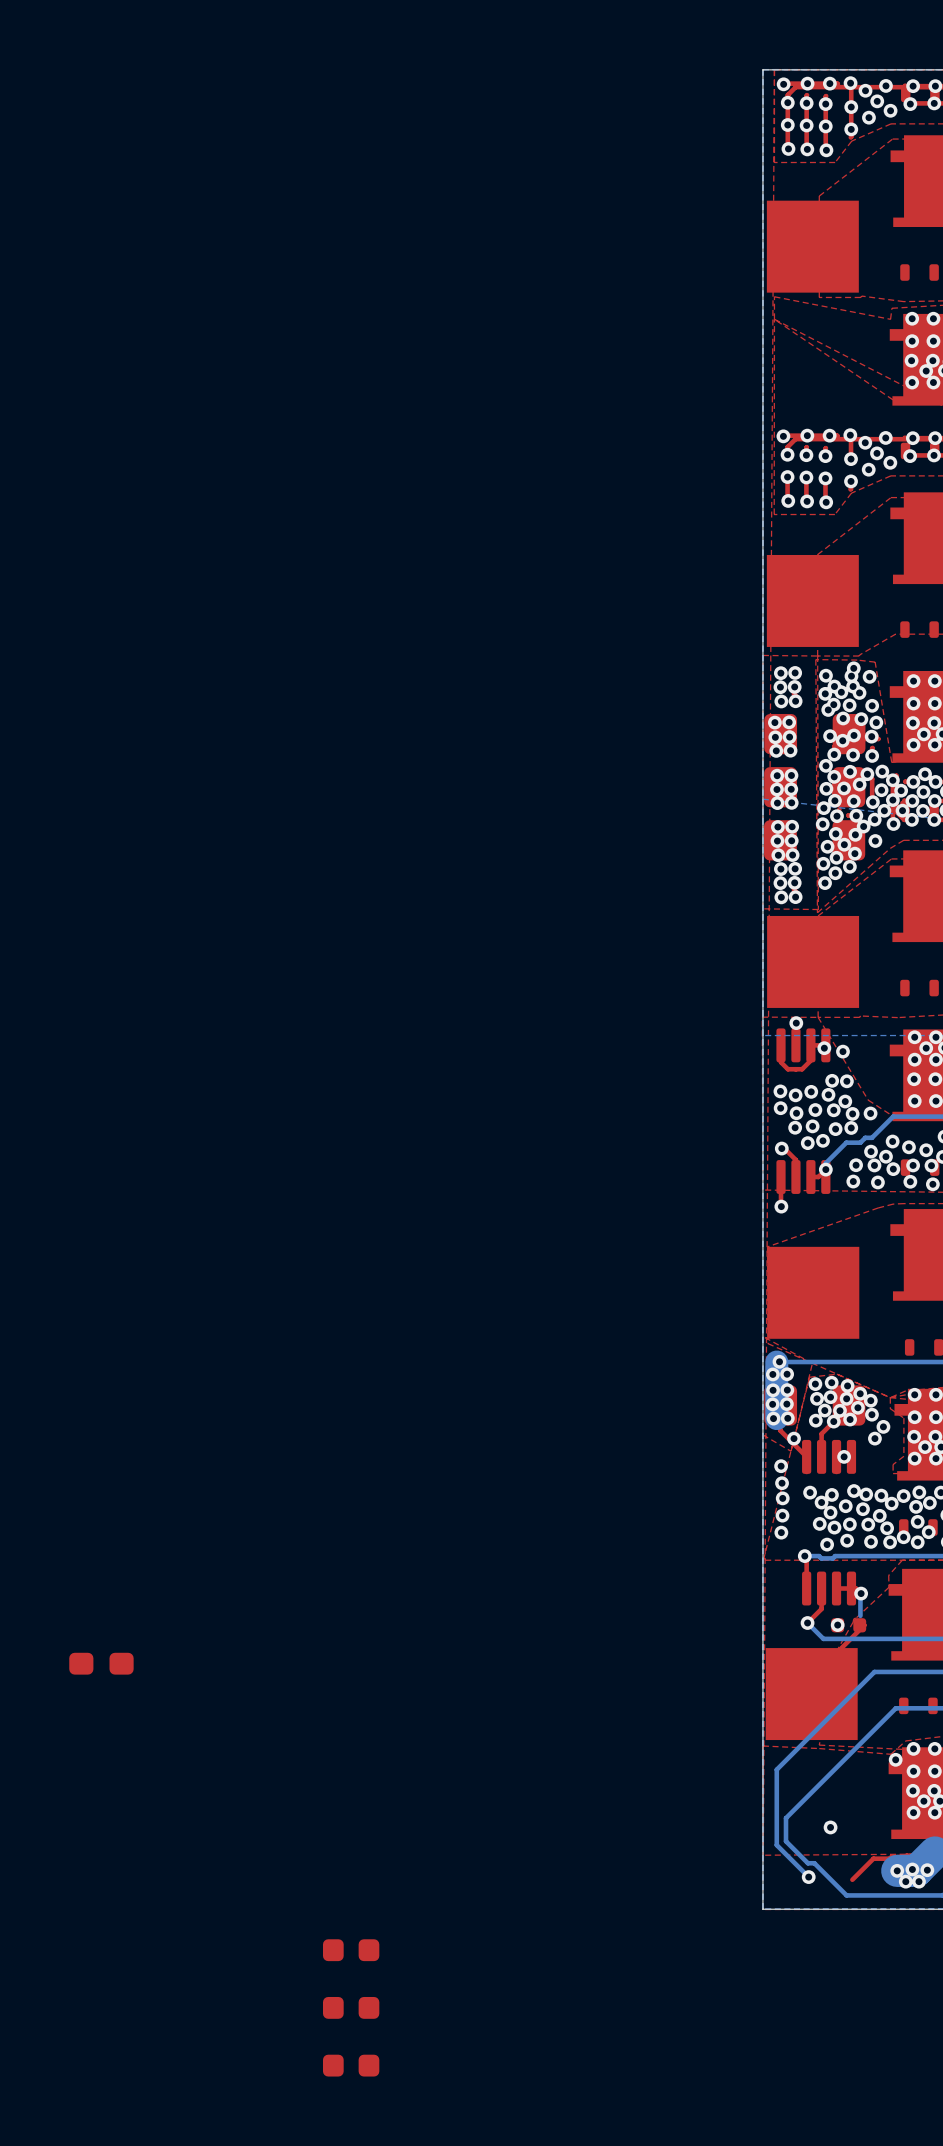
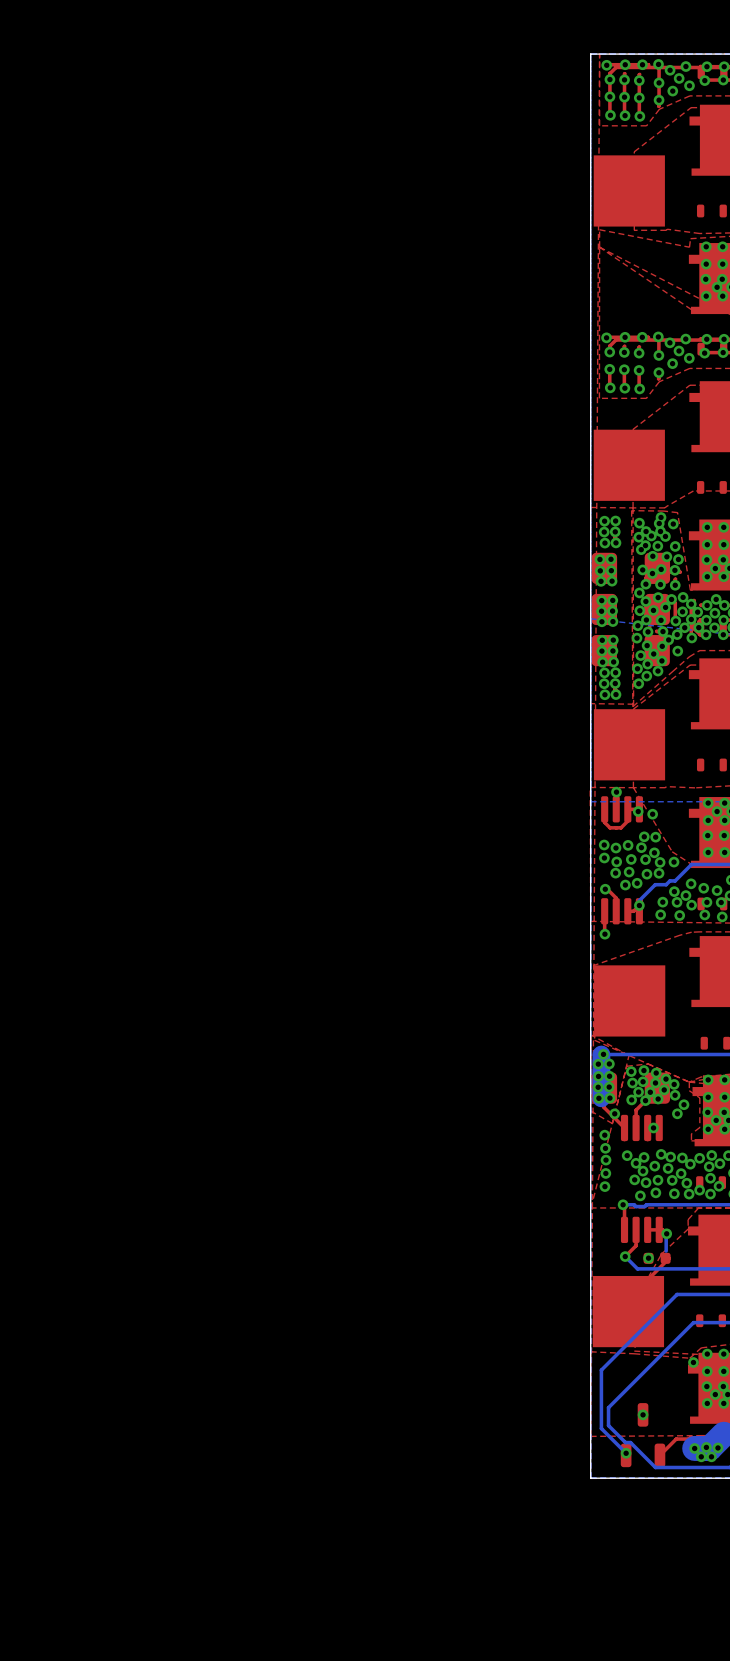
part: (101, 1663) -> none
part: none -> (643, 1435)
part: (351, 1950) -> none
part: (351, 2007) -> none
part: (351, 2065) -> none

